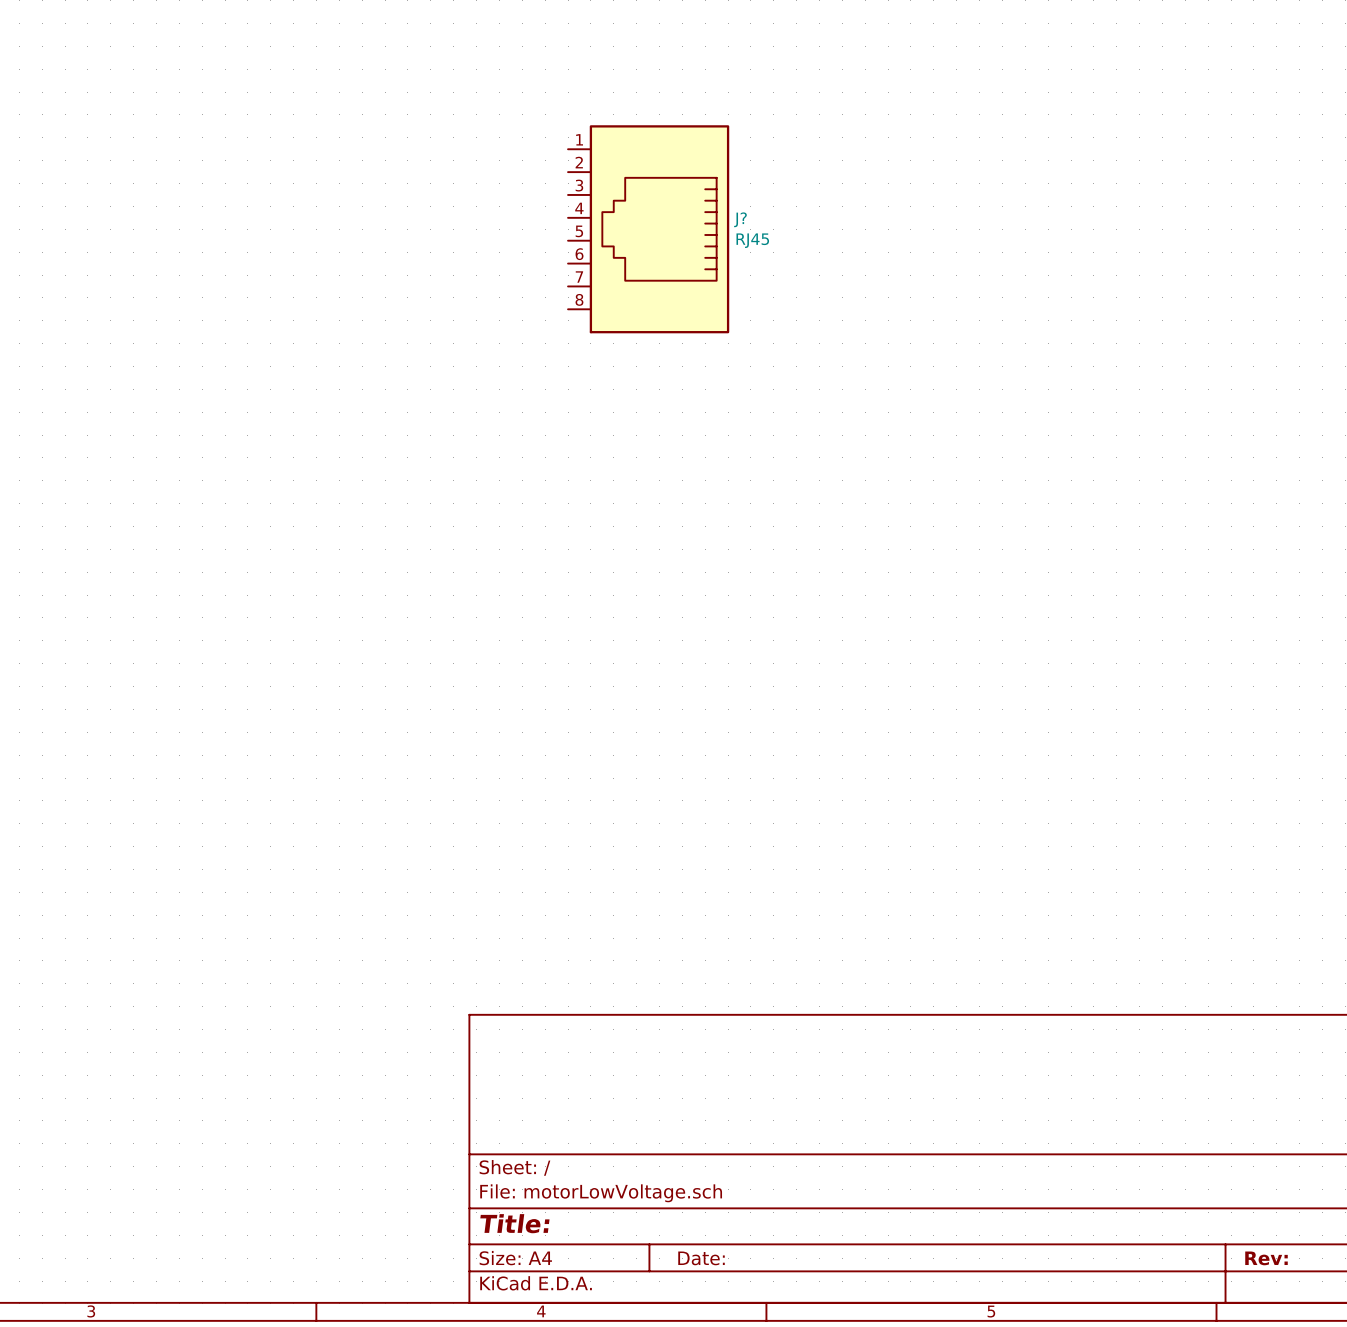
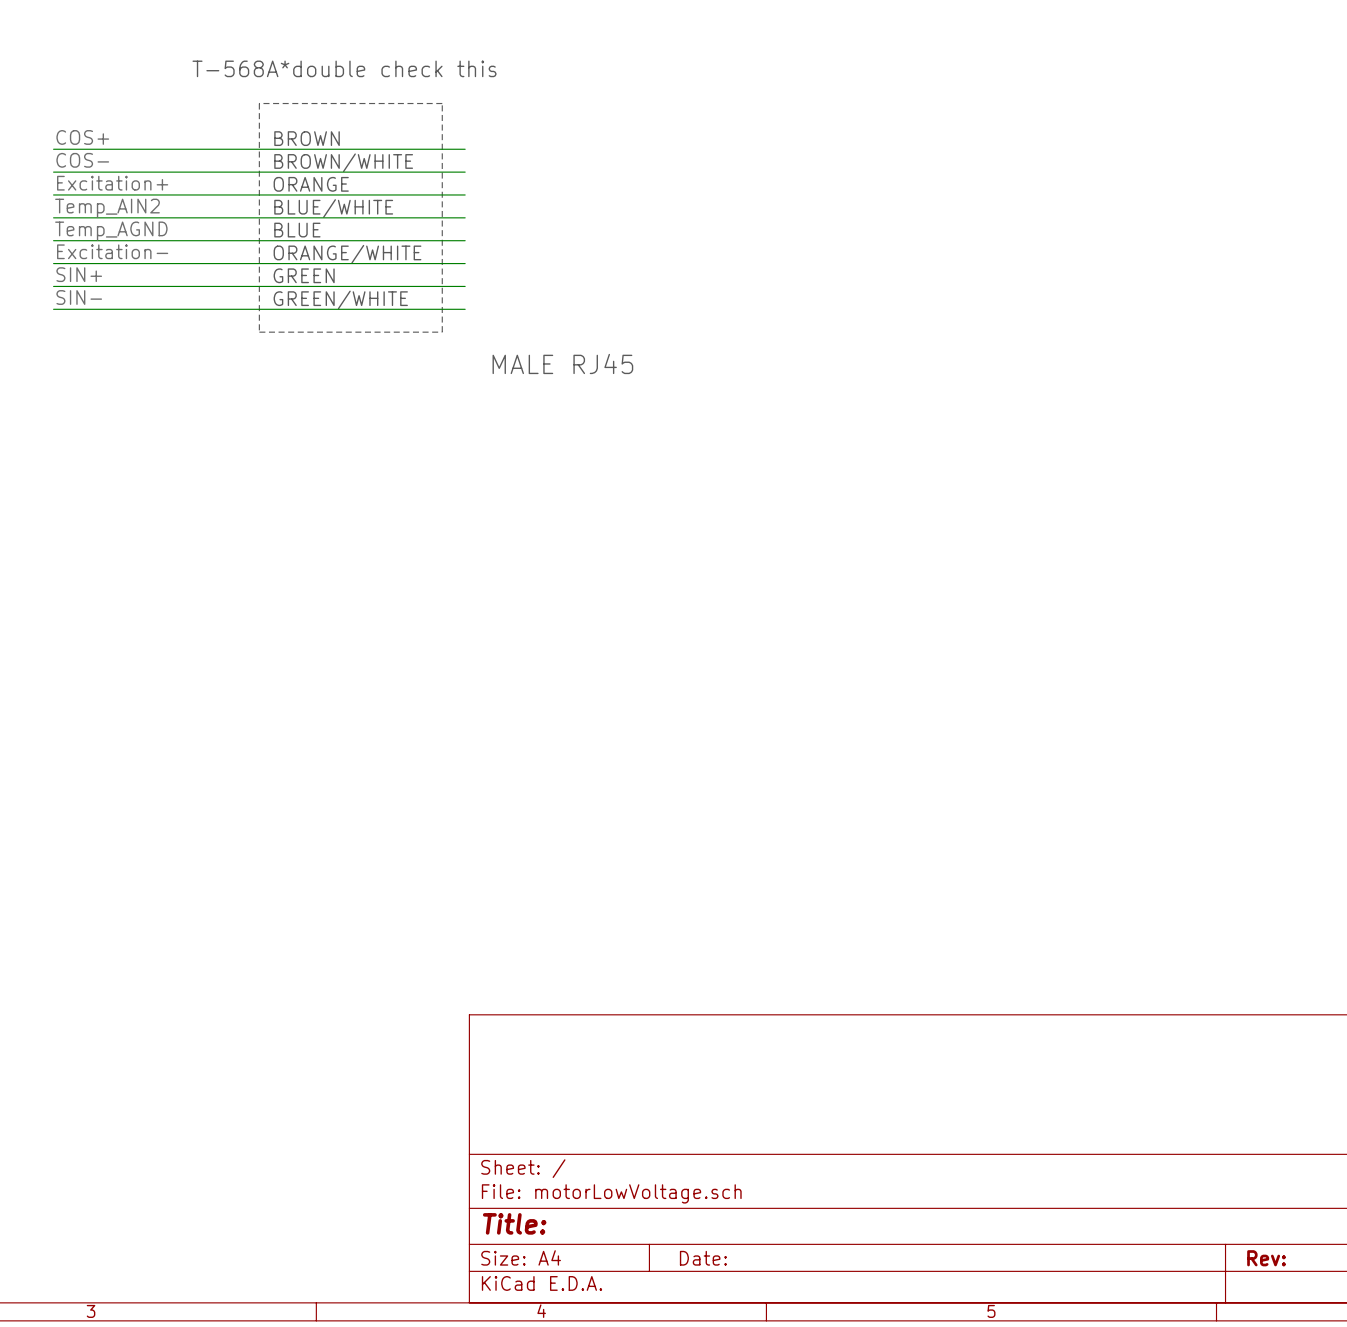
text: none -> T-568A*double check this (344, 68)
line: none -> (259, 103) (259, 332) (442, 332) (442, 103) (259, 103)
label: none -> COS+ (82, 137)
text: none -> BROWN (307, 138)
wire: none -> (53, 149) (465, 149)
label: none -> COS- (82, 160)
text: none -> BROWN/WHITE (343, 162)
wire: none -> (53, 172) (465, 172)
label: none -> Excitation+ (112, 183)
text: none -> ORANGE (311, 184)
wire: none -> (53, 194) (465, 194)
label: none -> Temp_AIN2 (107, 208)
text: none -> BLUE/WHITE (333, 208)
wire: none -> (53, 217) (465, 217)
J?: RJ45 (648, 229) -> none
label: none -> Temp_AGND (111, 231)
text: none -> BLUE (297, 230)
wire: none -> (53, 240) (465, 240)
label: none -> Excitation- (112, 251)
text: none -> ORANGE/WHITE (347, 254)
wire: none -> (53, 263) (465, 263)
label: none -> SIN+ (79, 274)
text: none -> GREEN (304, 275)
wire: none -> (53, 286) (465, 286)
label: none -> SIN- (79, 297)
text: none -> GREEN/WHITE (340, 299)
wire: none -> (53, 309) (465, 309)
text: none -> MALE RJ45 (562, 363)

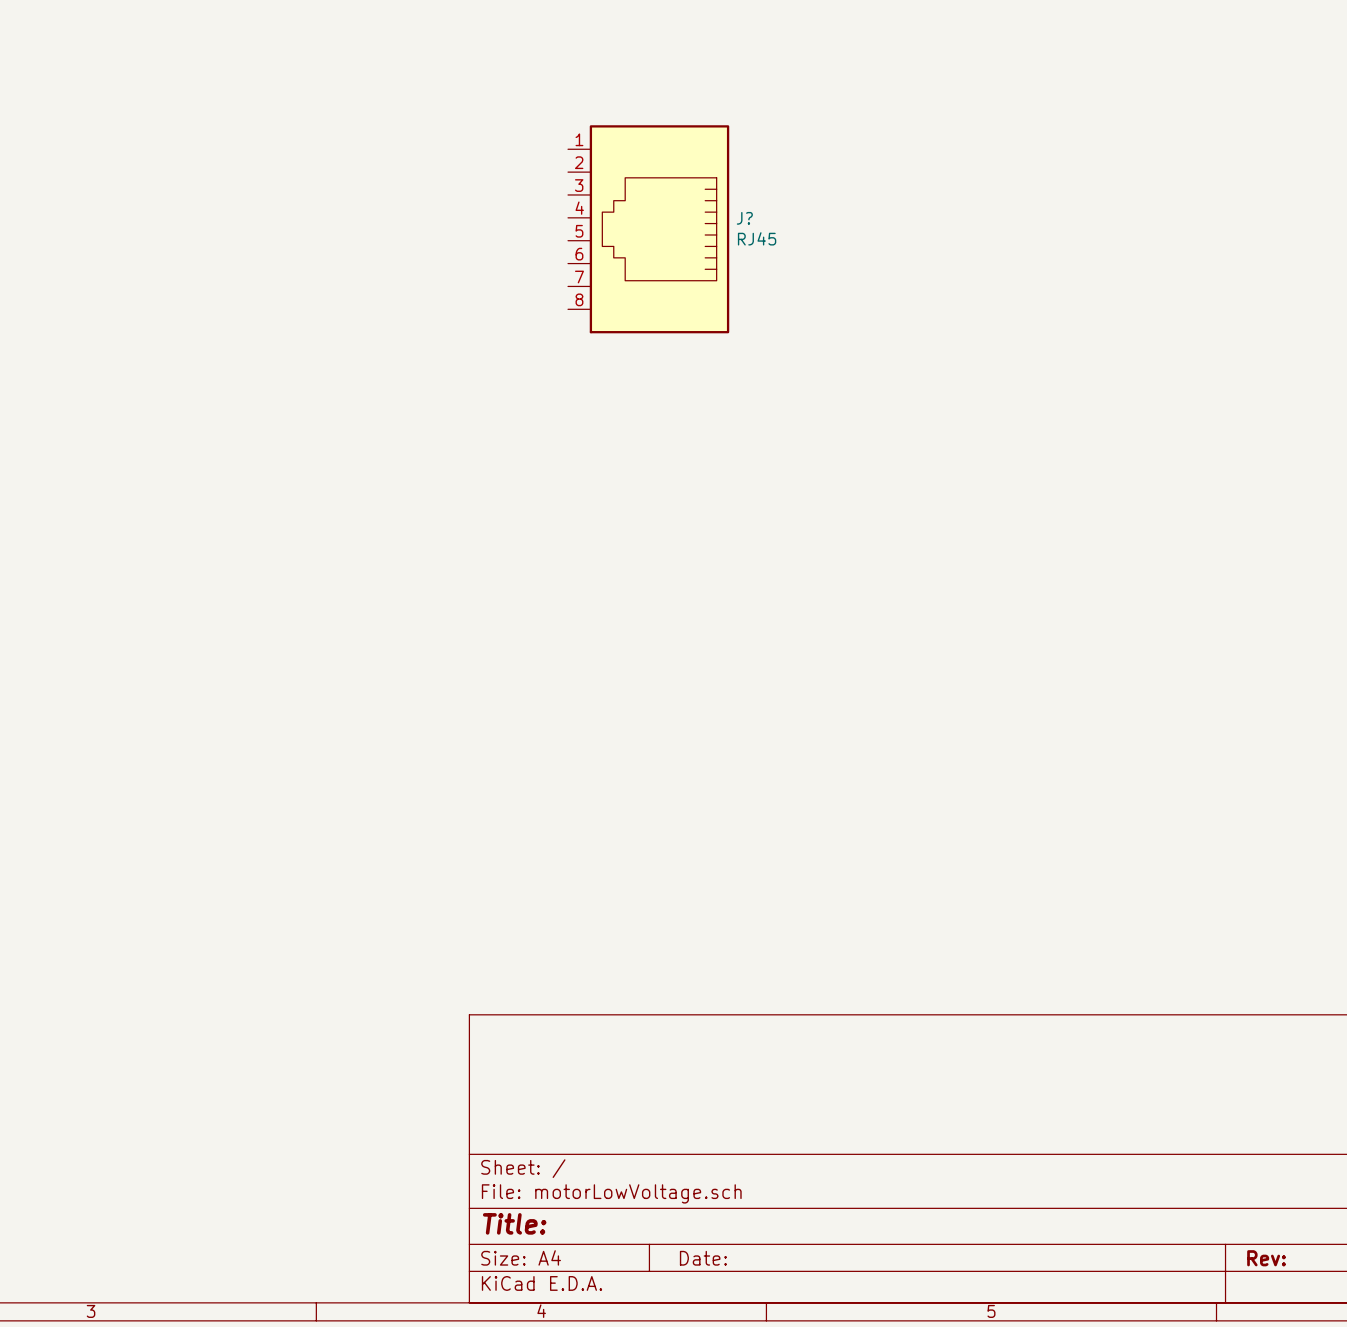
text: T-568A*double check this (344, 68) -> none
line: (259, 103) (259, 332) (442, 332) (442, 103) (259, 103) -> none
label: COS+ (82, 137) -> none
text: BROWN (307, 138) -> none
wire: (53, 149) (465, 149) -> none
label: COS- (82, 160) -> none
text: BROWN/WHITE (343, 162) -> none
wire: (53, 172) (465, 172) -> none
label: Excitation+ (112, 183) -> none
text: ORANGE (311, 184) -> none
wire: (53, 194) (465, 194) -> none
label: Temp_AIN2 (107, 208) -> none
text: BLUE/WHITE (333, 208) -> none
wire: (53, 217) (465, 217) -> none
J?: none -> RJ45 (648, 229)
text: BLUE (297, 230) -> none
label: Temp_AGND (111, 231) -> none
wire: (53, 240) (465, 240) -> none
label: Excitation- (112, 251) -> none
text: ORANGE/WHITE (347, 254) -> none
wire: (53, 263) (465, 263) -> none
label: SIN+ (79, 274) -> none
text: GREEN (304, 275) -> none
wire: (53, 286) (465, 286) -> none
label: SIN- (79, 297) -> none
text: GREEN/WHITE (340, 299) -> none
wire: (53, 309) (465, 309) -> none
text: MALE RJ45 (562, 363) -> none

